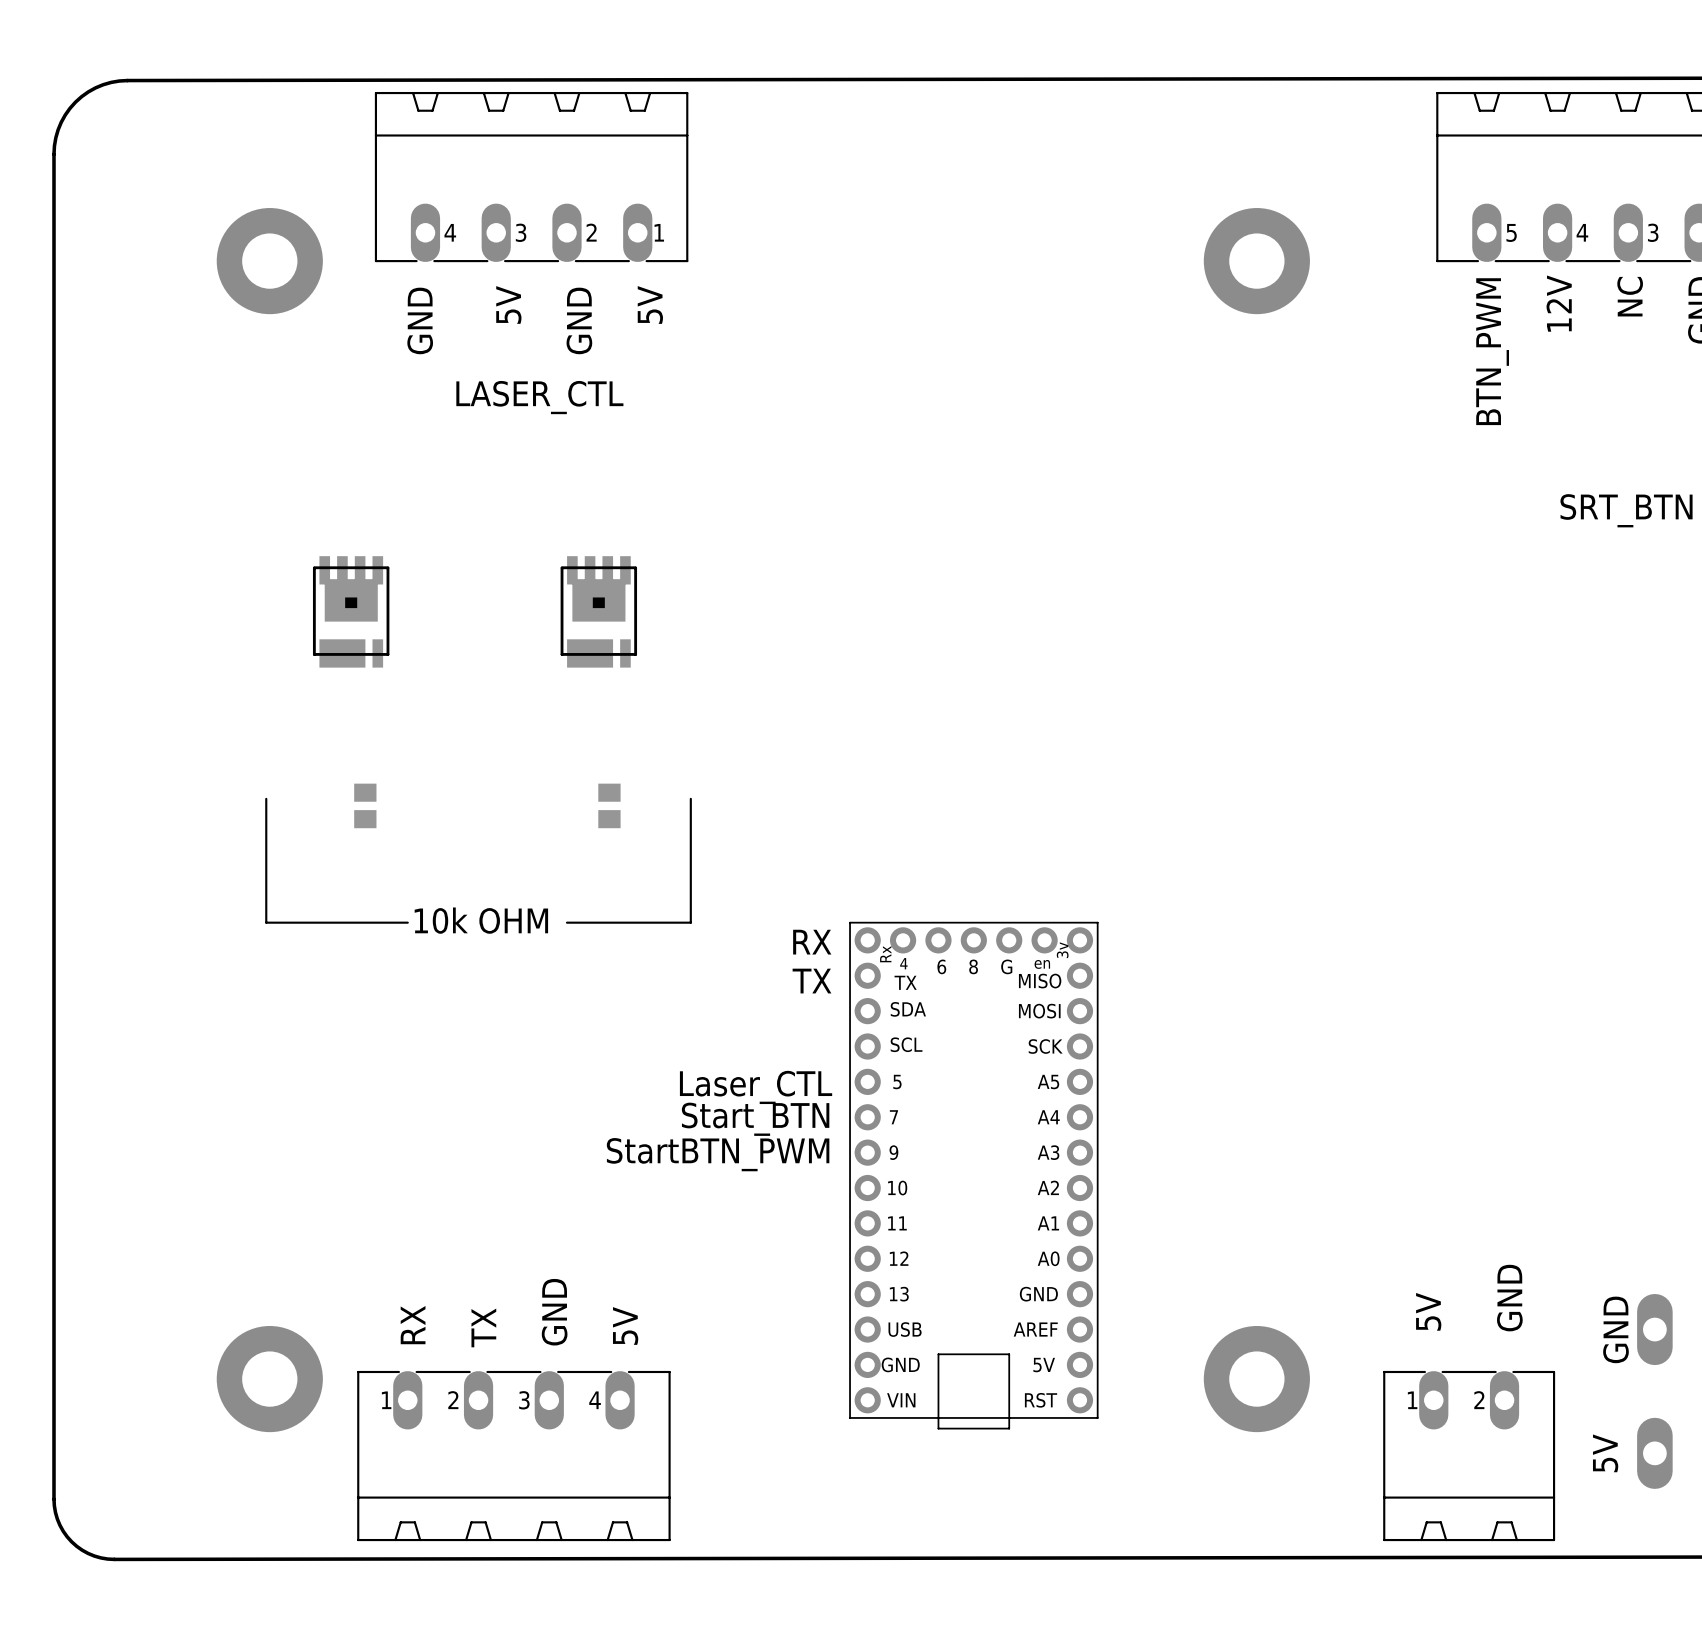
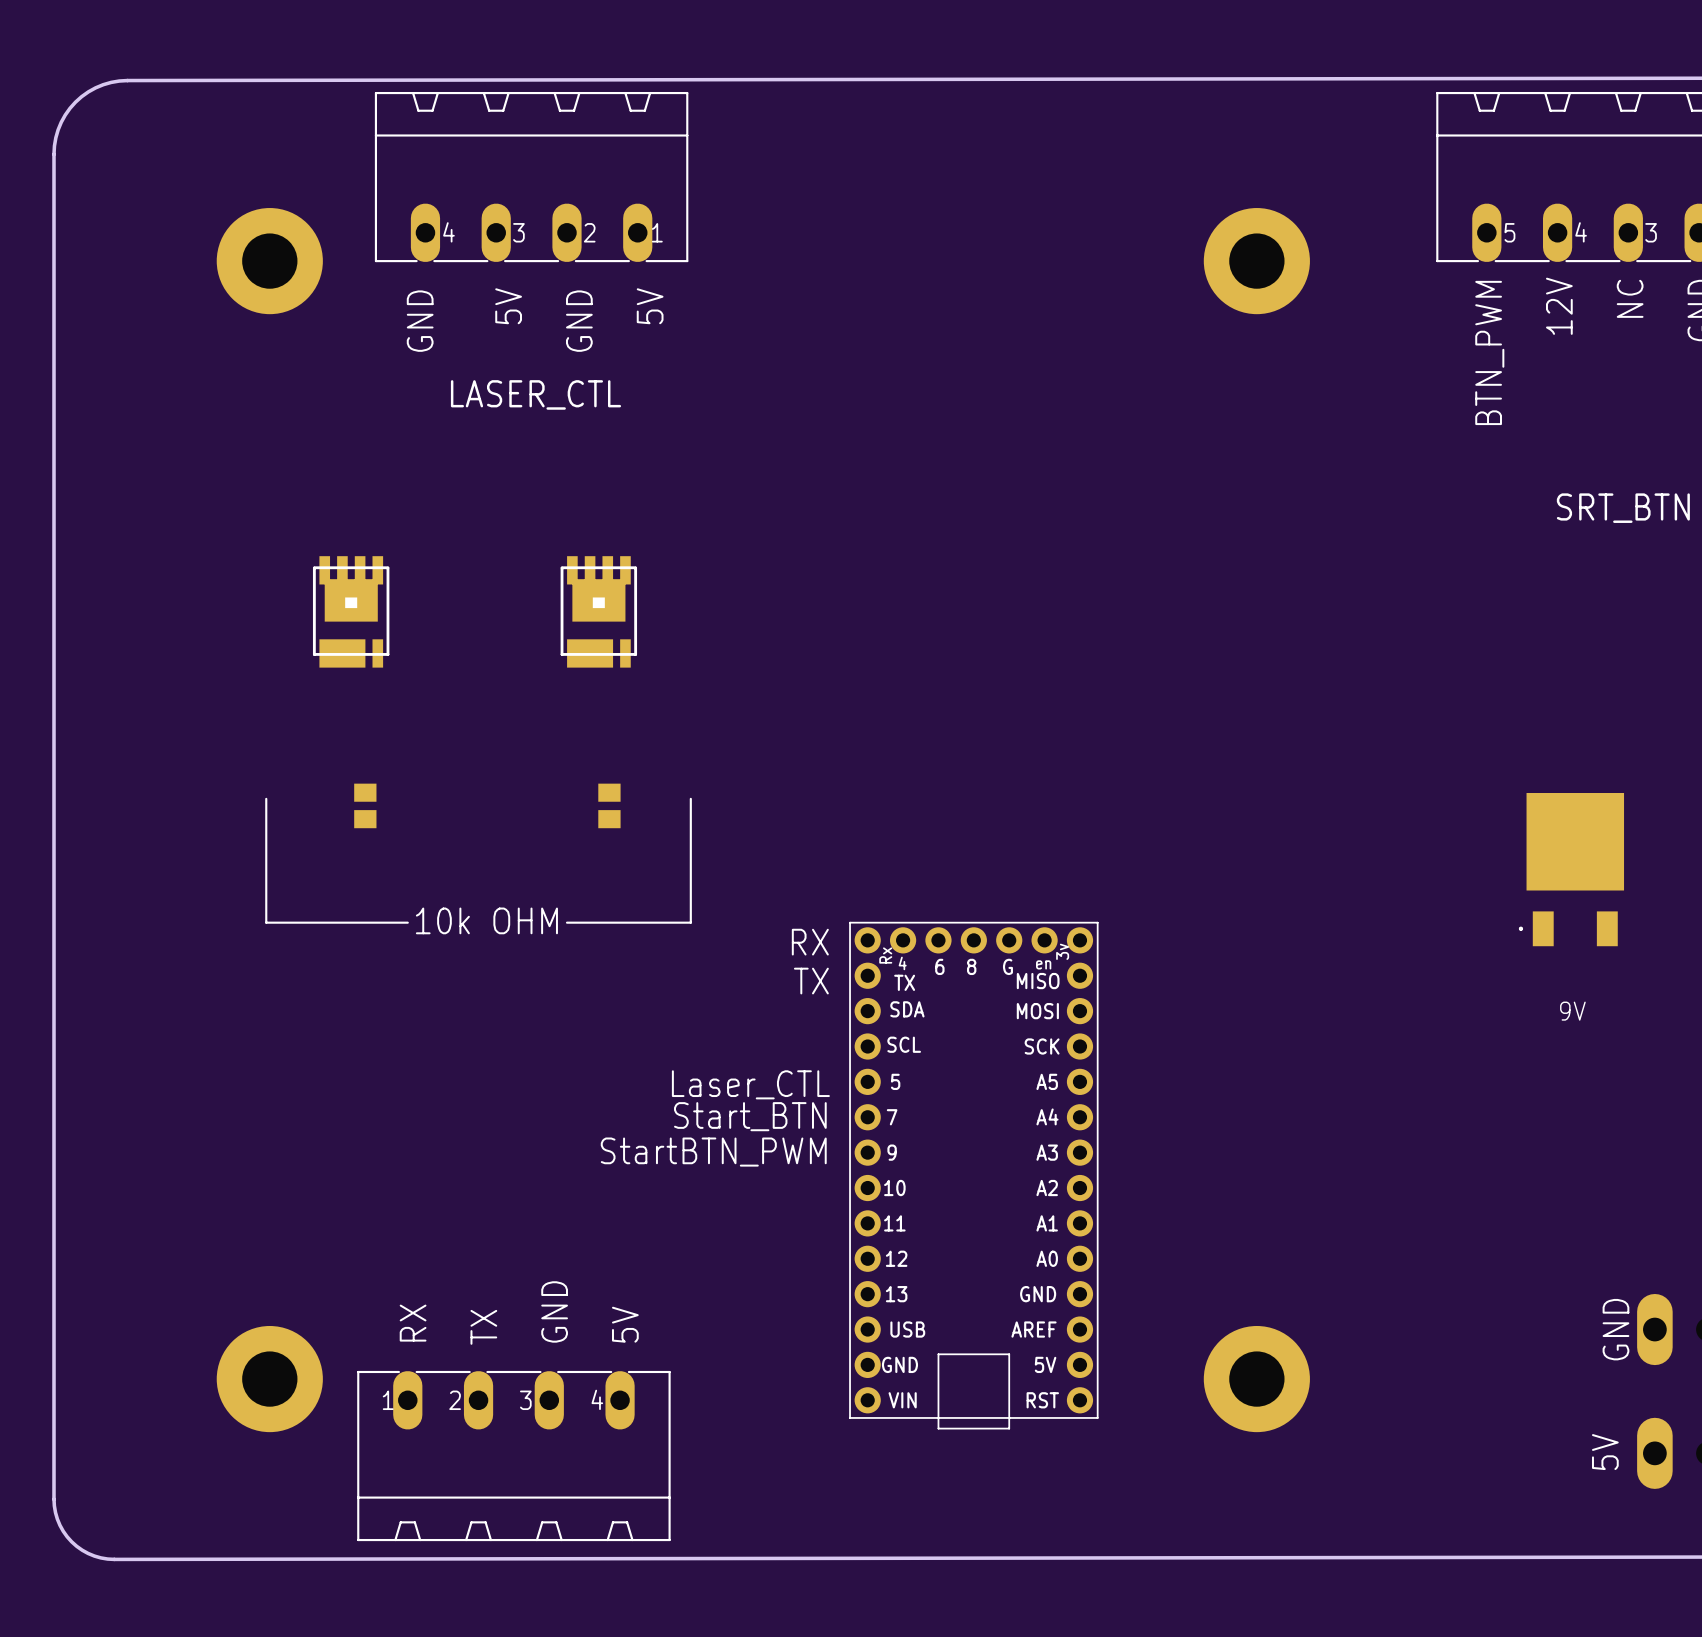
9V: none -> (1571, 869)
text: GND (1509, 1298) -> none
text: 5V (1428, 1311) -> none
part: (1469, 1456) -> none

